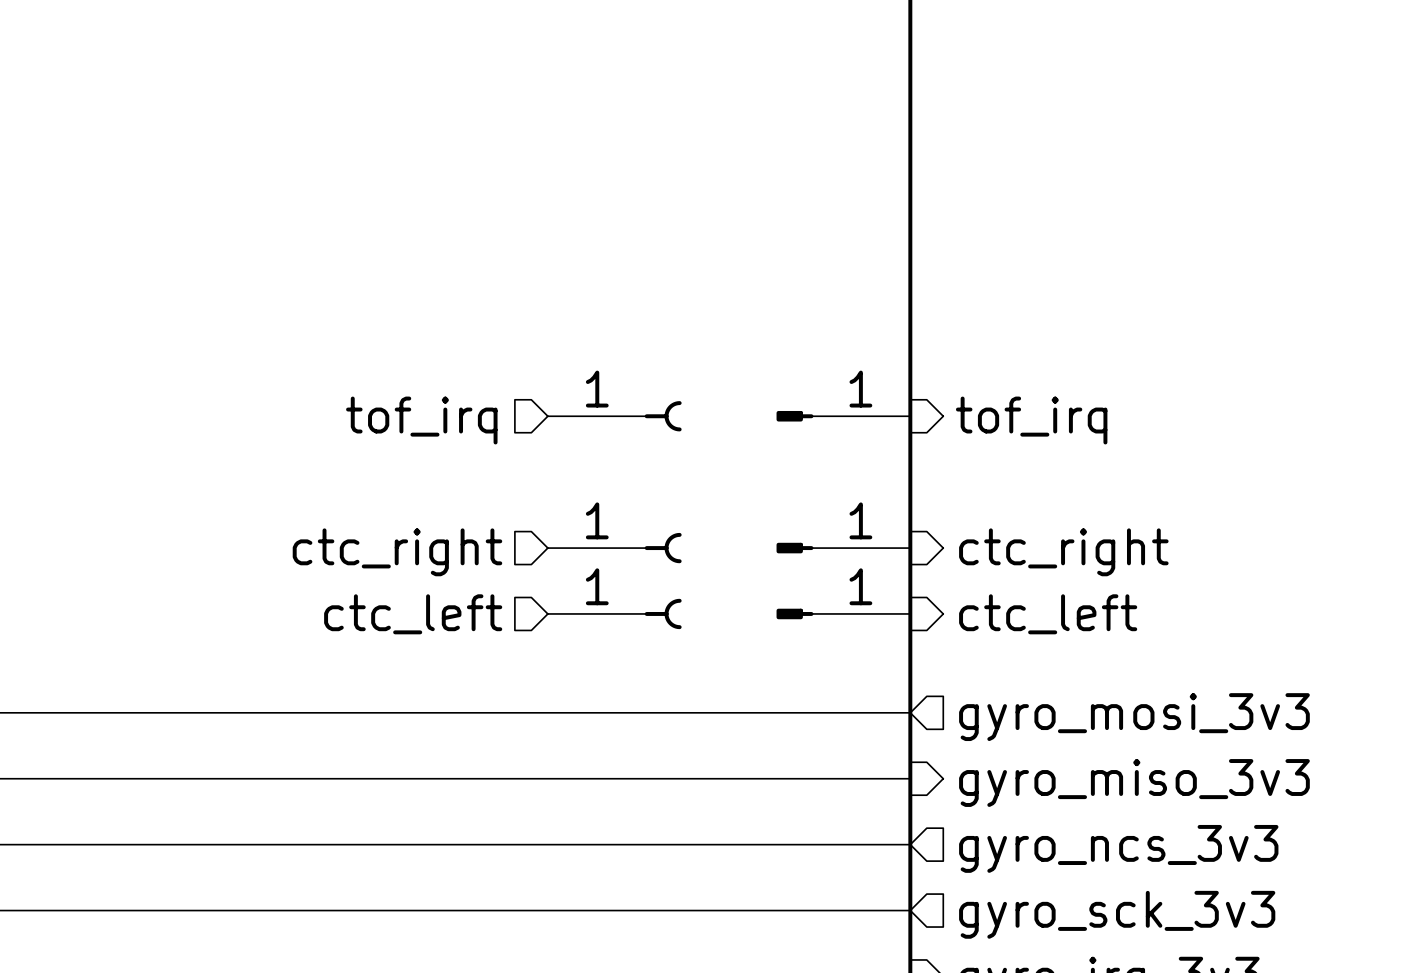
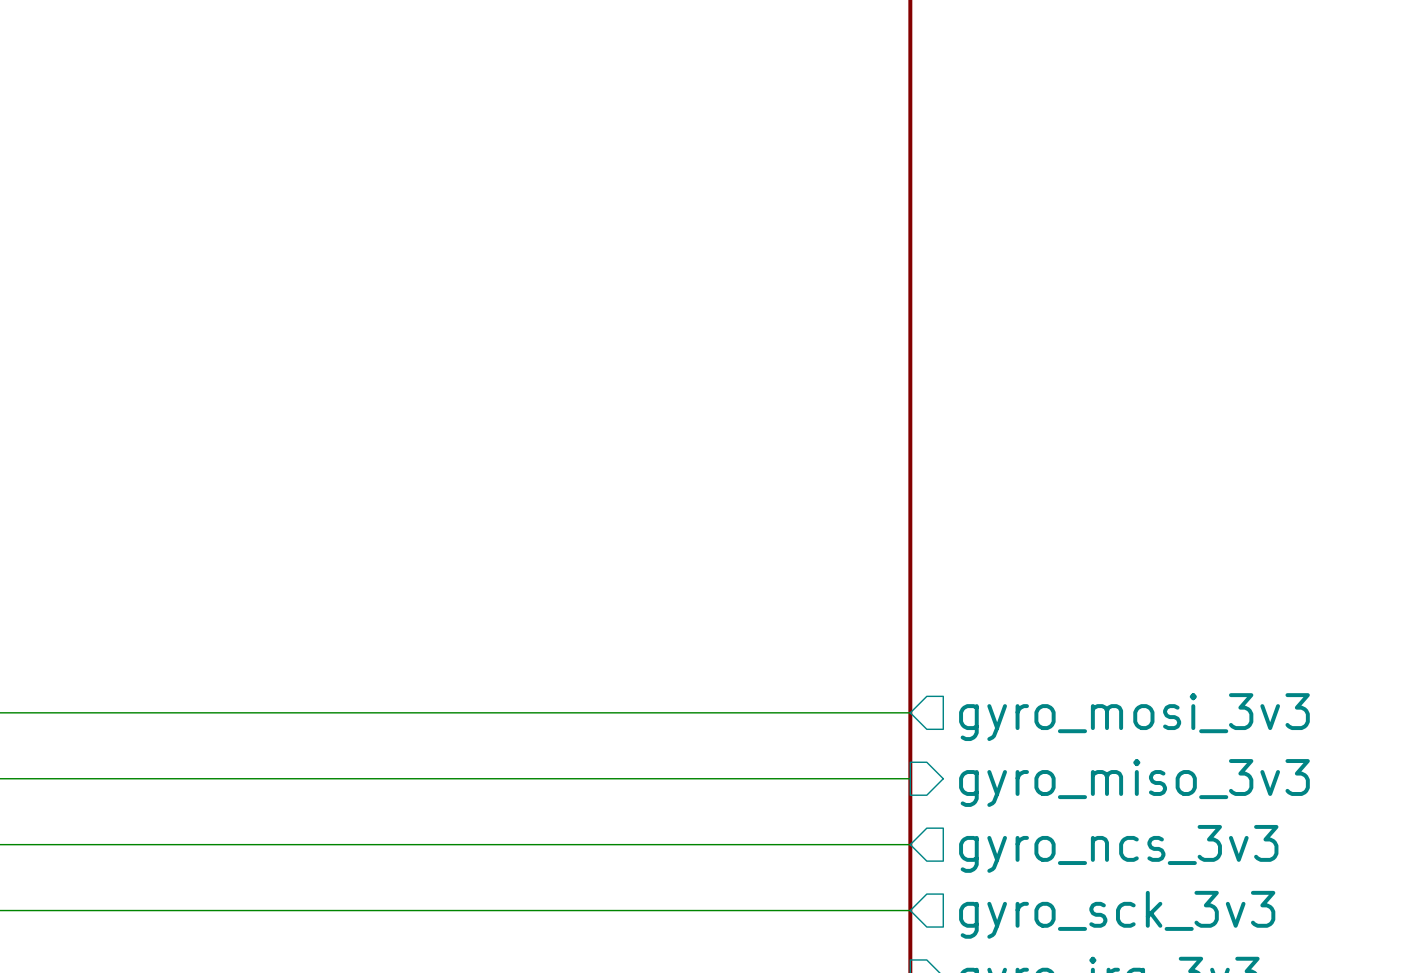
part: (614, 416) -> none
part: (843, 416) -> none
hierarchical label: tof_irq (421, 420) -> none
sheet pin: tof_irq (1031, 420) -> none
part: (614, 548) -> none
part: (843, 548) -> none
hierarchical label: ctc_right (397, 552) -> none
sheet pin: ctc_right (1063, 552) -> none
part: (614, 613) -> none
part: (843, 613) -> none
hierarchical label: ctc_left (413, 614) -> none
sheet pin: ctc_left (1048, 614) -> none

